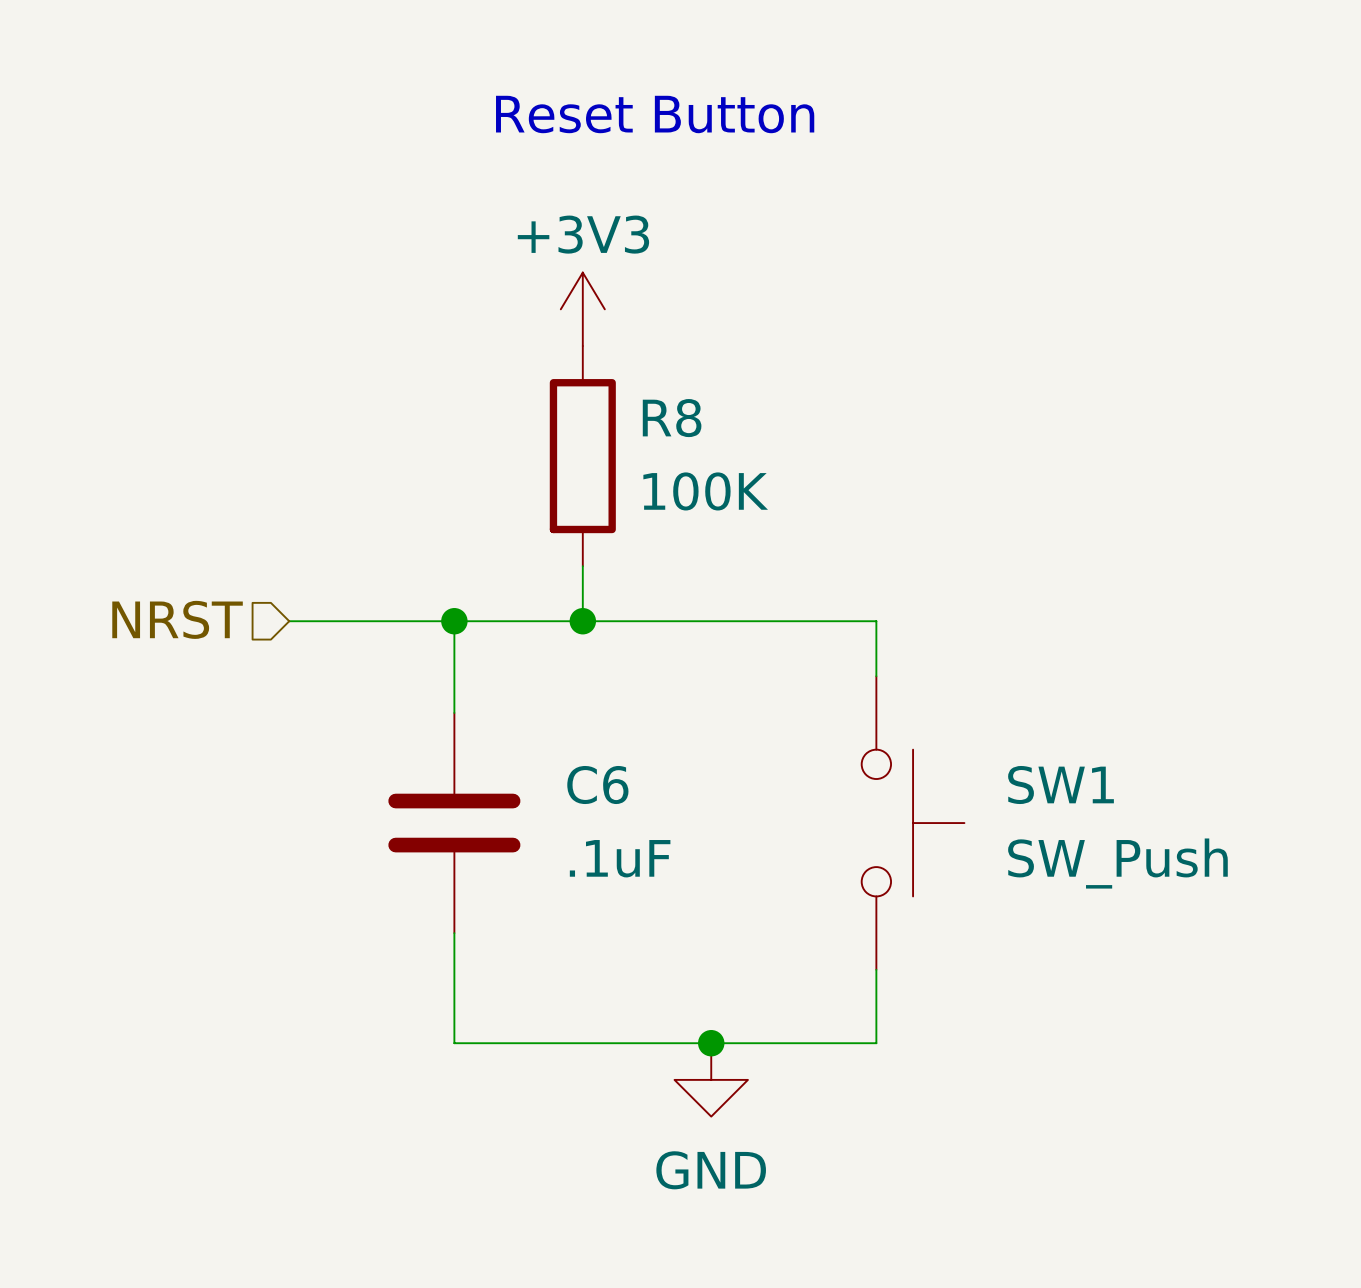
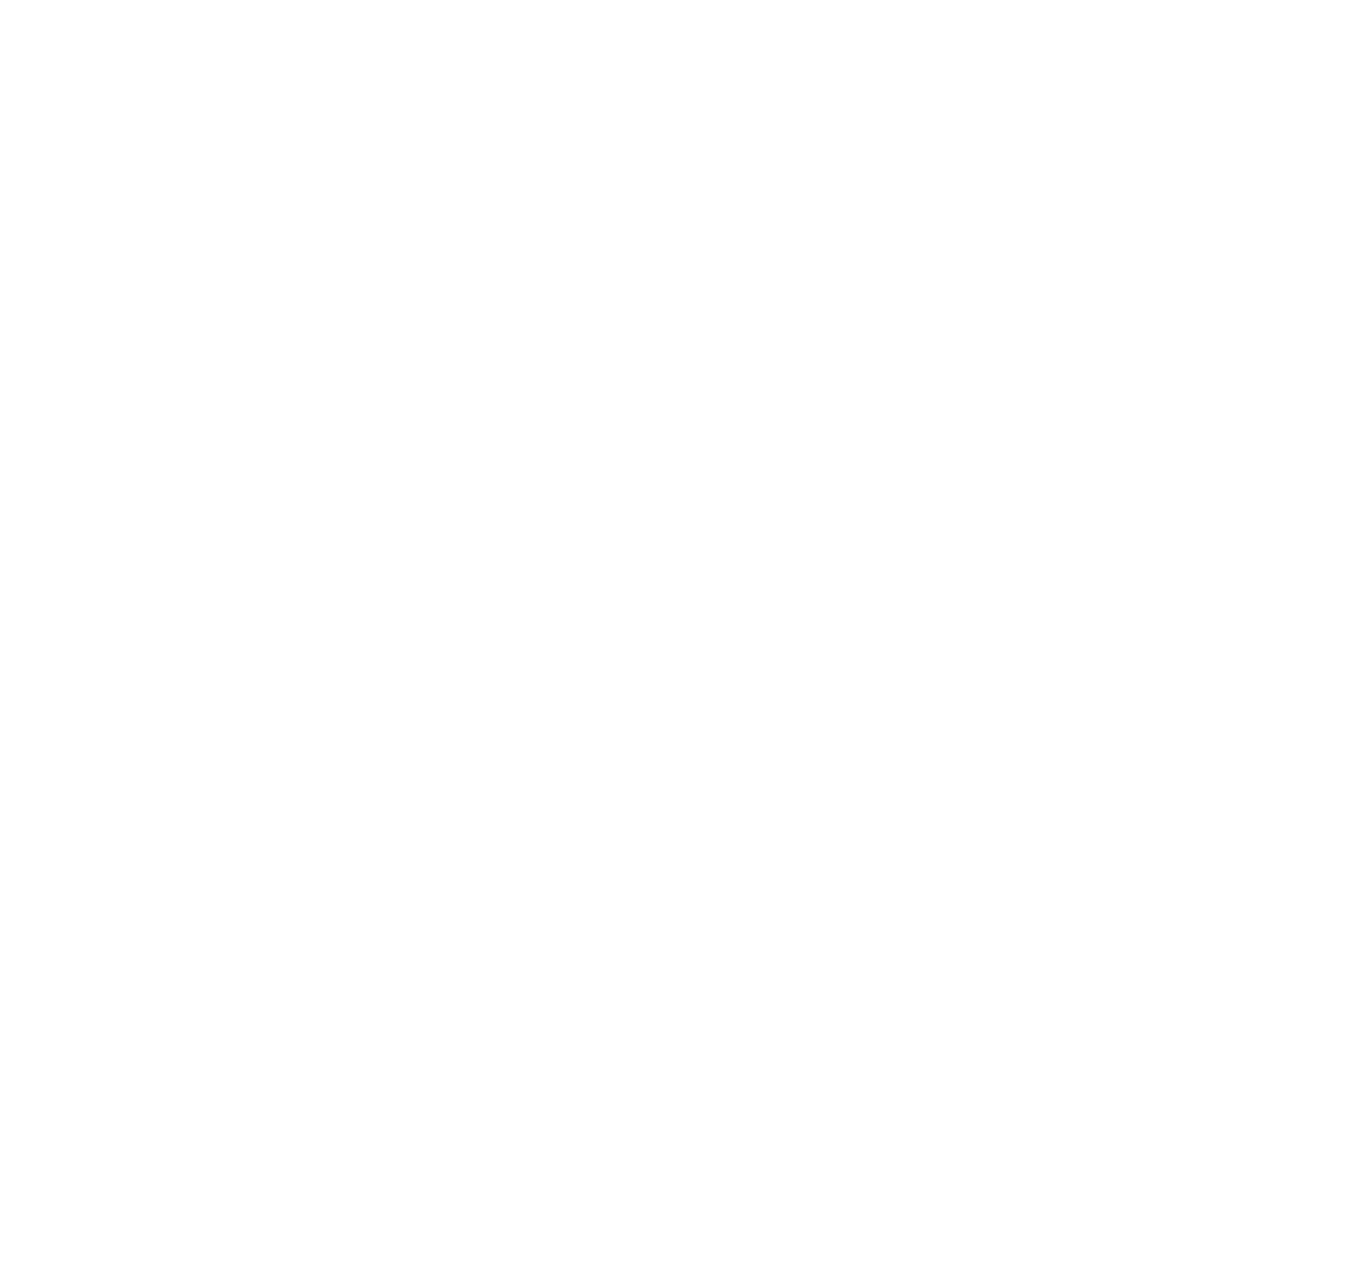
text: Reset Button (655, 114) -> none
power symbol: +3V3 (582, 309) -> none
R8: 100K (582, 456) -> none
wire: (582, 566) (582, 621) -> none
hierarchical label: NRST (177, 619) -> none
wire: (289, 621) (876, 621) (876, 676) -> none
wire: (454, 621) (454, 712) -> none
junction: (454, 621) -> none
junction: (582, 621) -> none
C6: .1uF (454, 823) -> none
SW1: SW_Push (913, 823) -> none
wire: (454, 933) (454, 1043) (876, 1043) (876, 969) -> none
junction: (711, 1043) -> none
power symbol: GND (711, 1079) -> none

